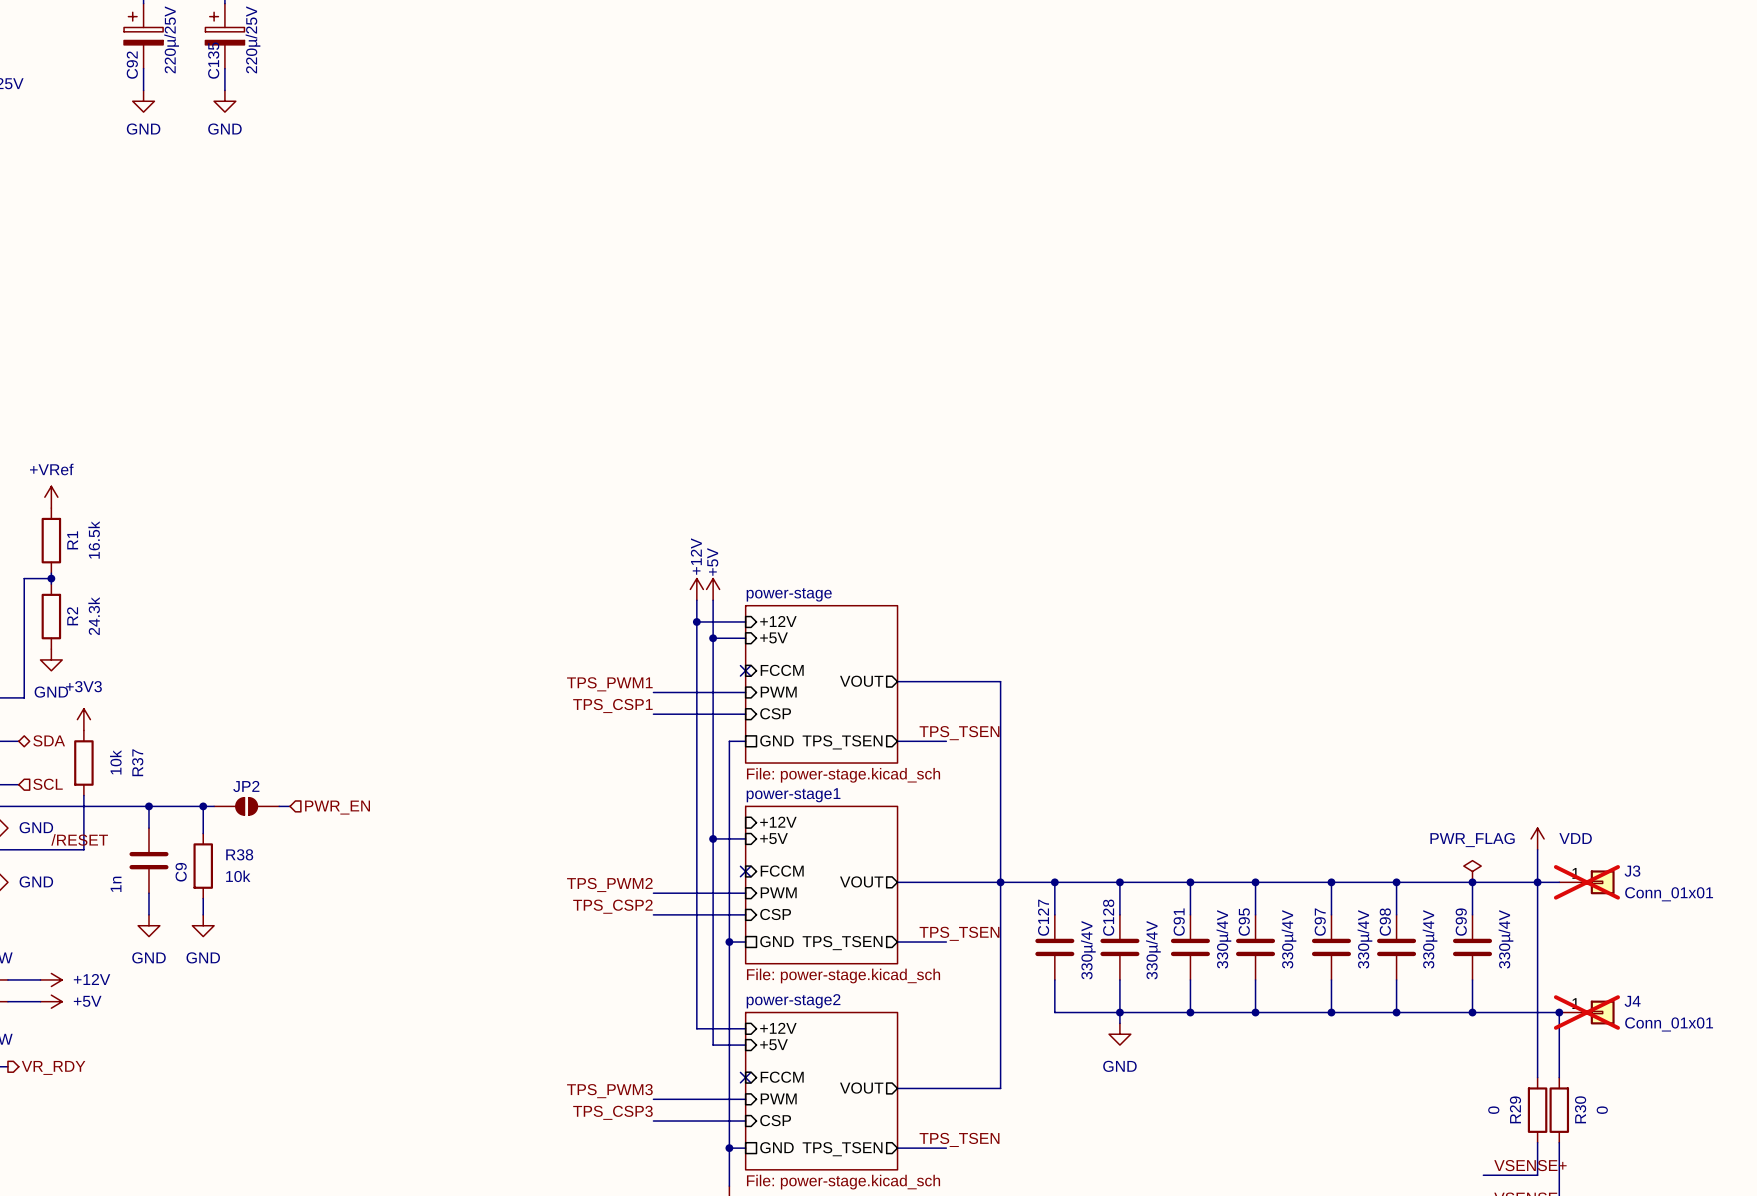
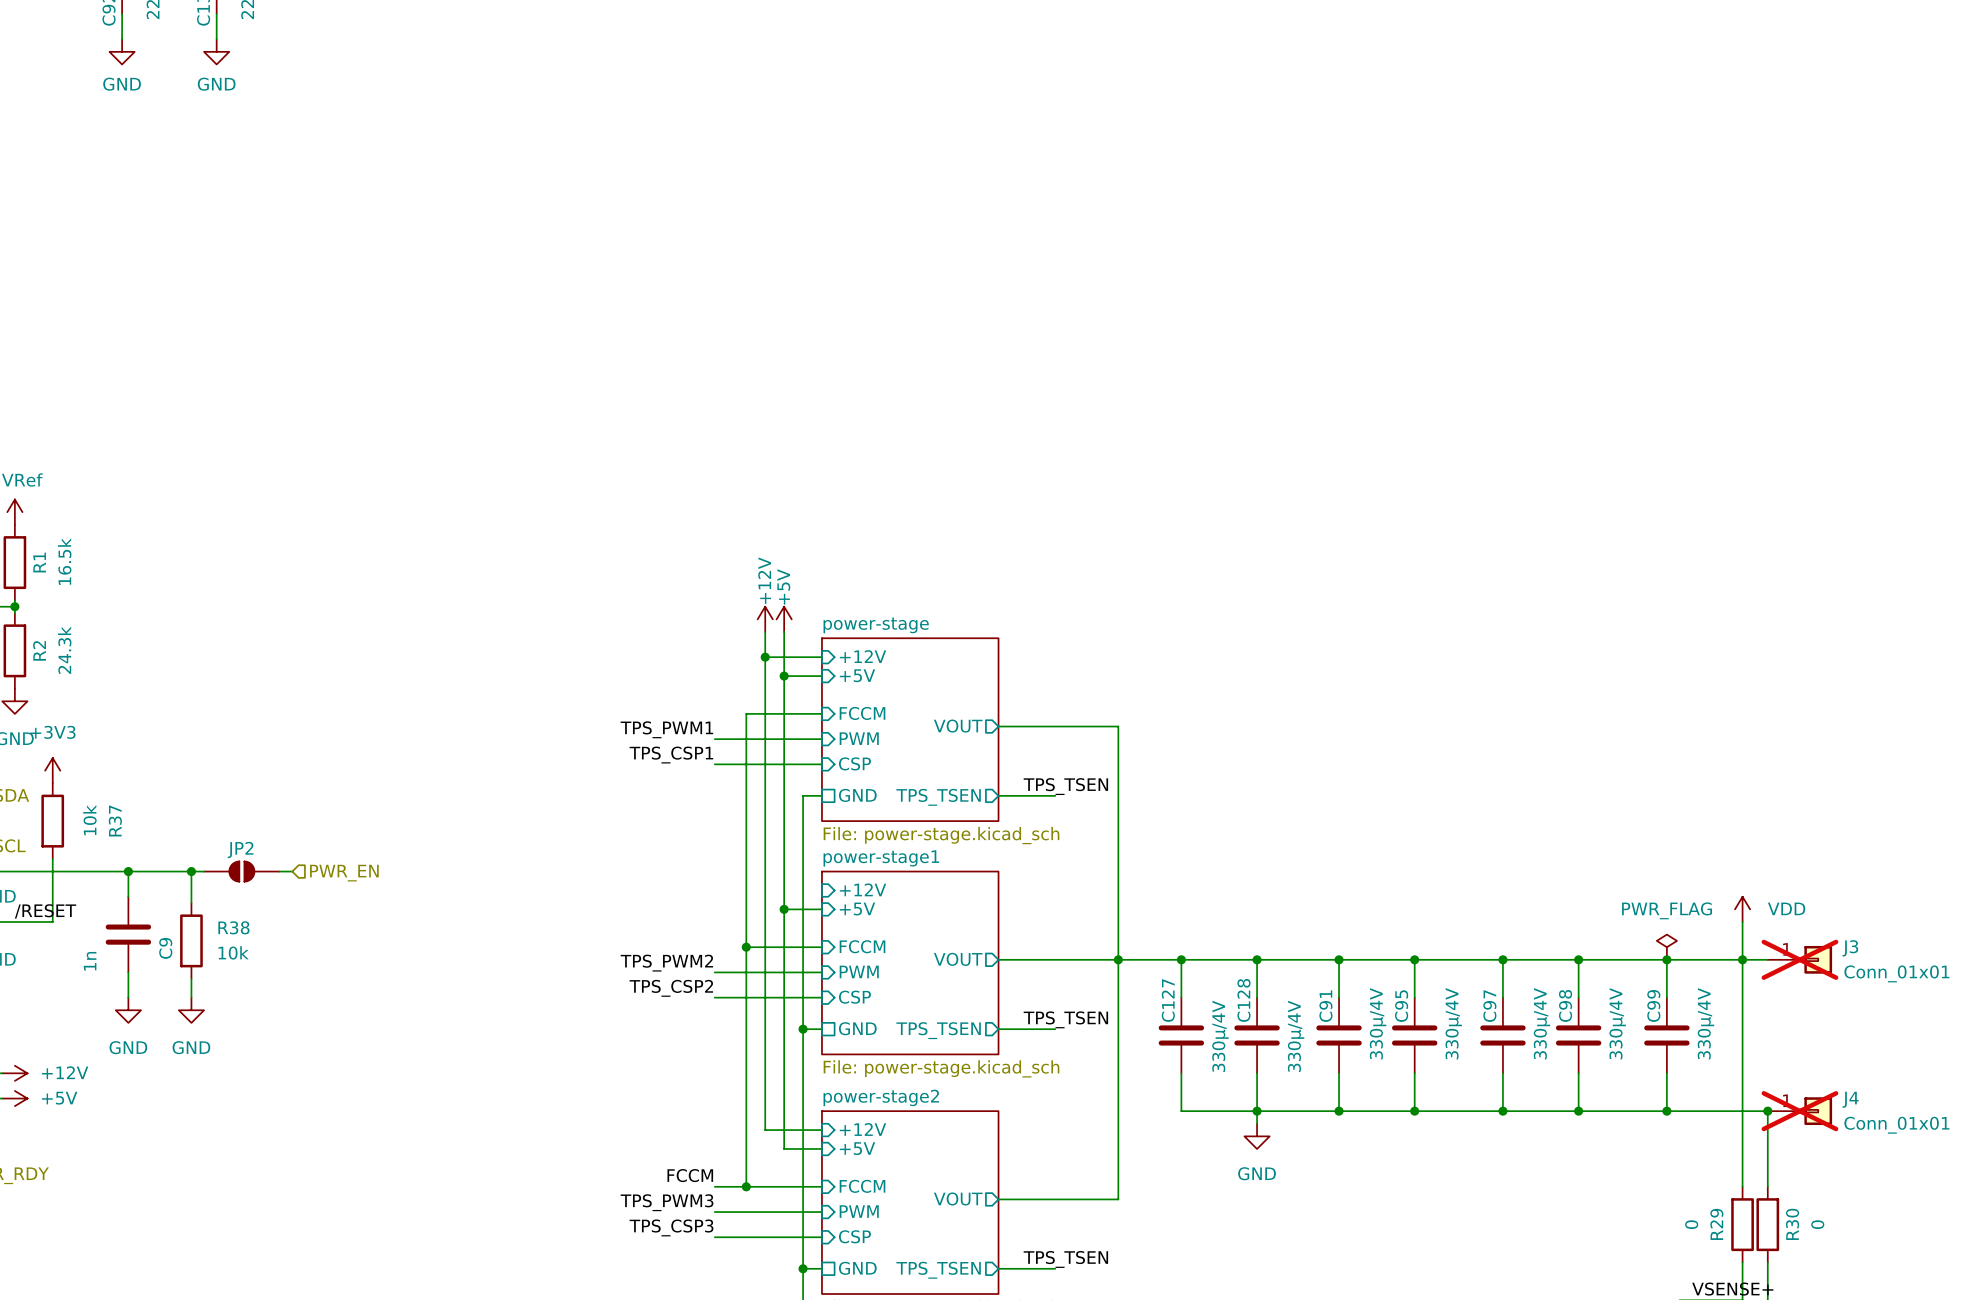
wire: none -> (821, 713) (746, 713) (746, 1186)
no-connect mark: (745, 670) -> none
wire: none -> (746, 947) (821, 947)
junction: none -> (746, 947)
no-connect mark: (745, 871) -> none
label: none -> FCCM (690, 1175)
wire: none -> (714, 1186) (821, 1186)
junction: none -> (746, 1186)
no-connect mark: (745, 1077) -> none

